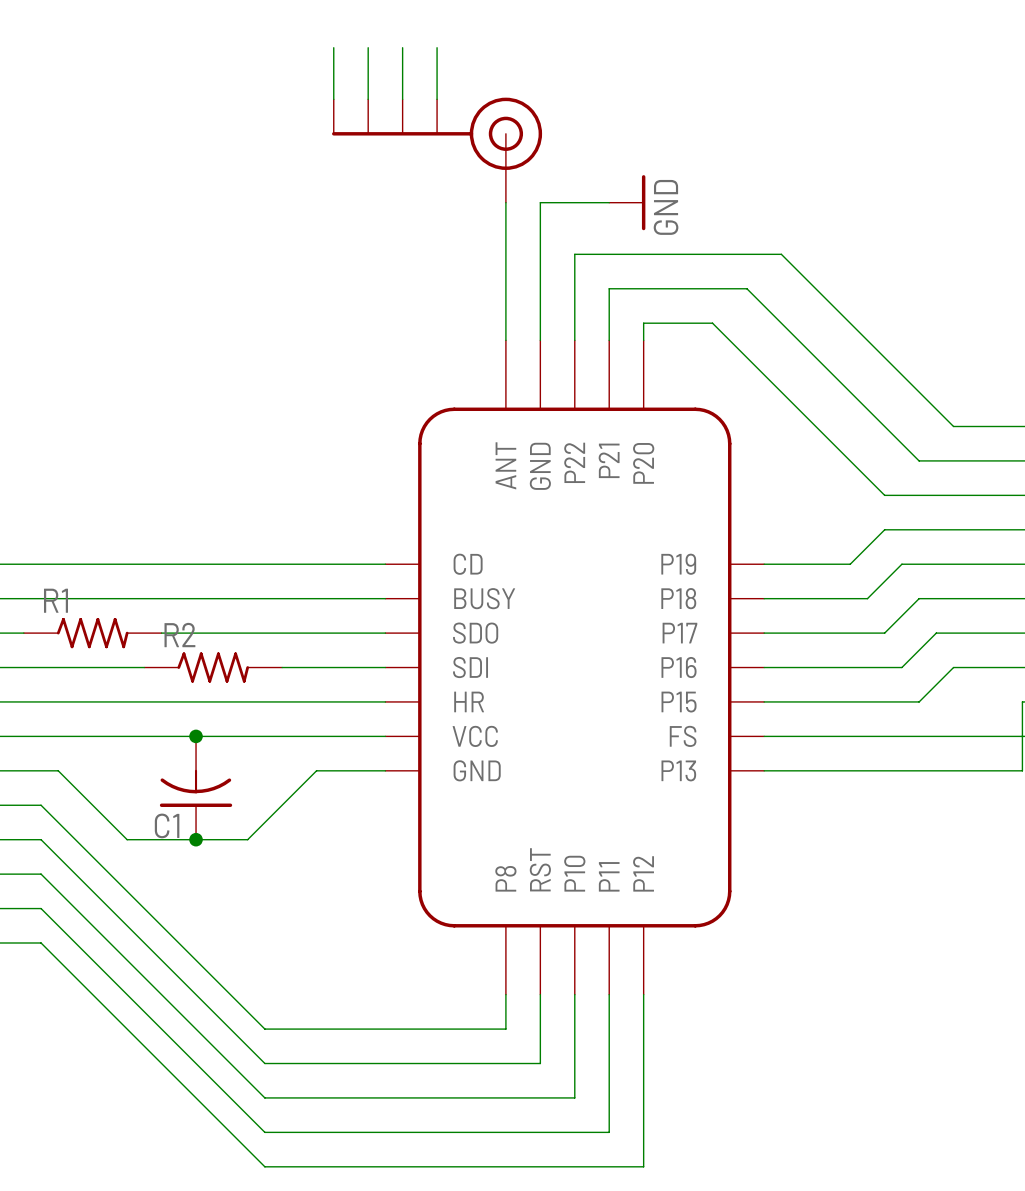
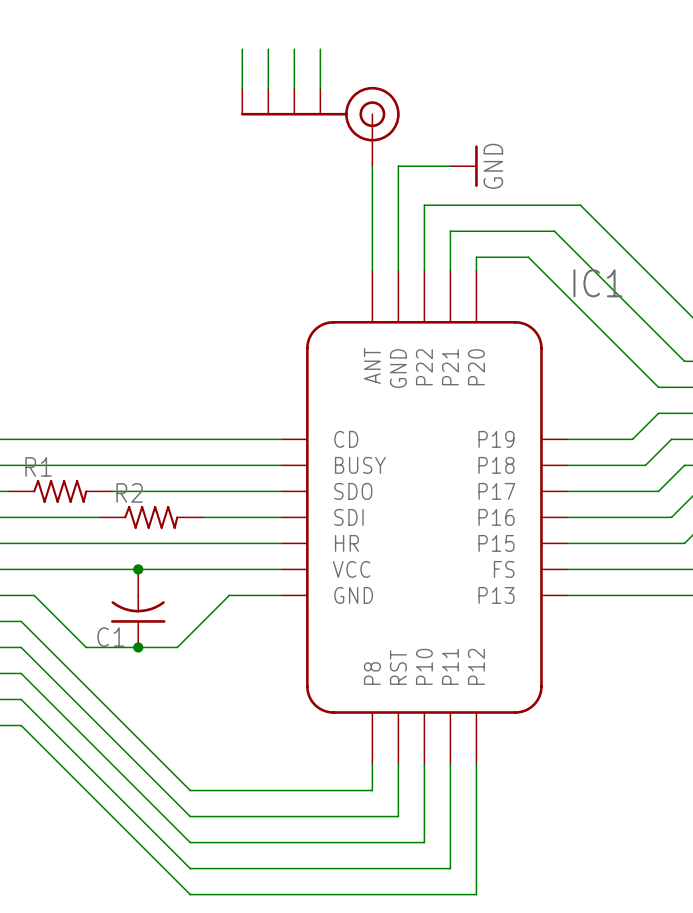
IC1 name: none -> IC1 (597, 283)

